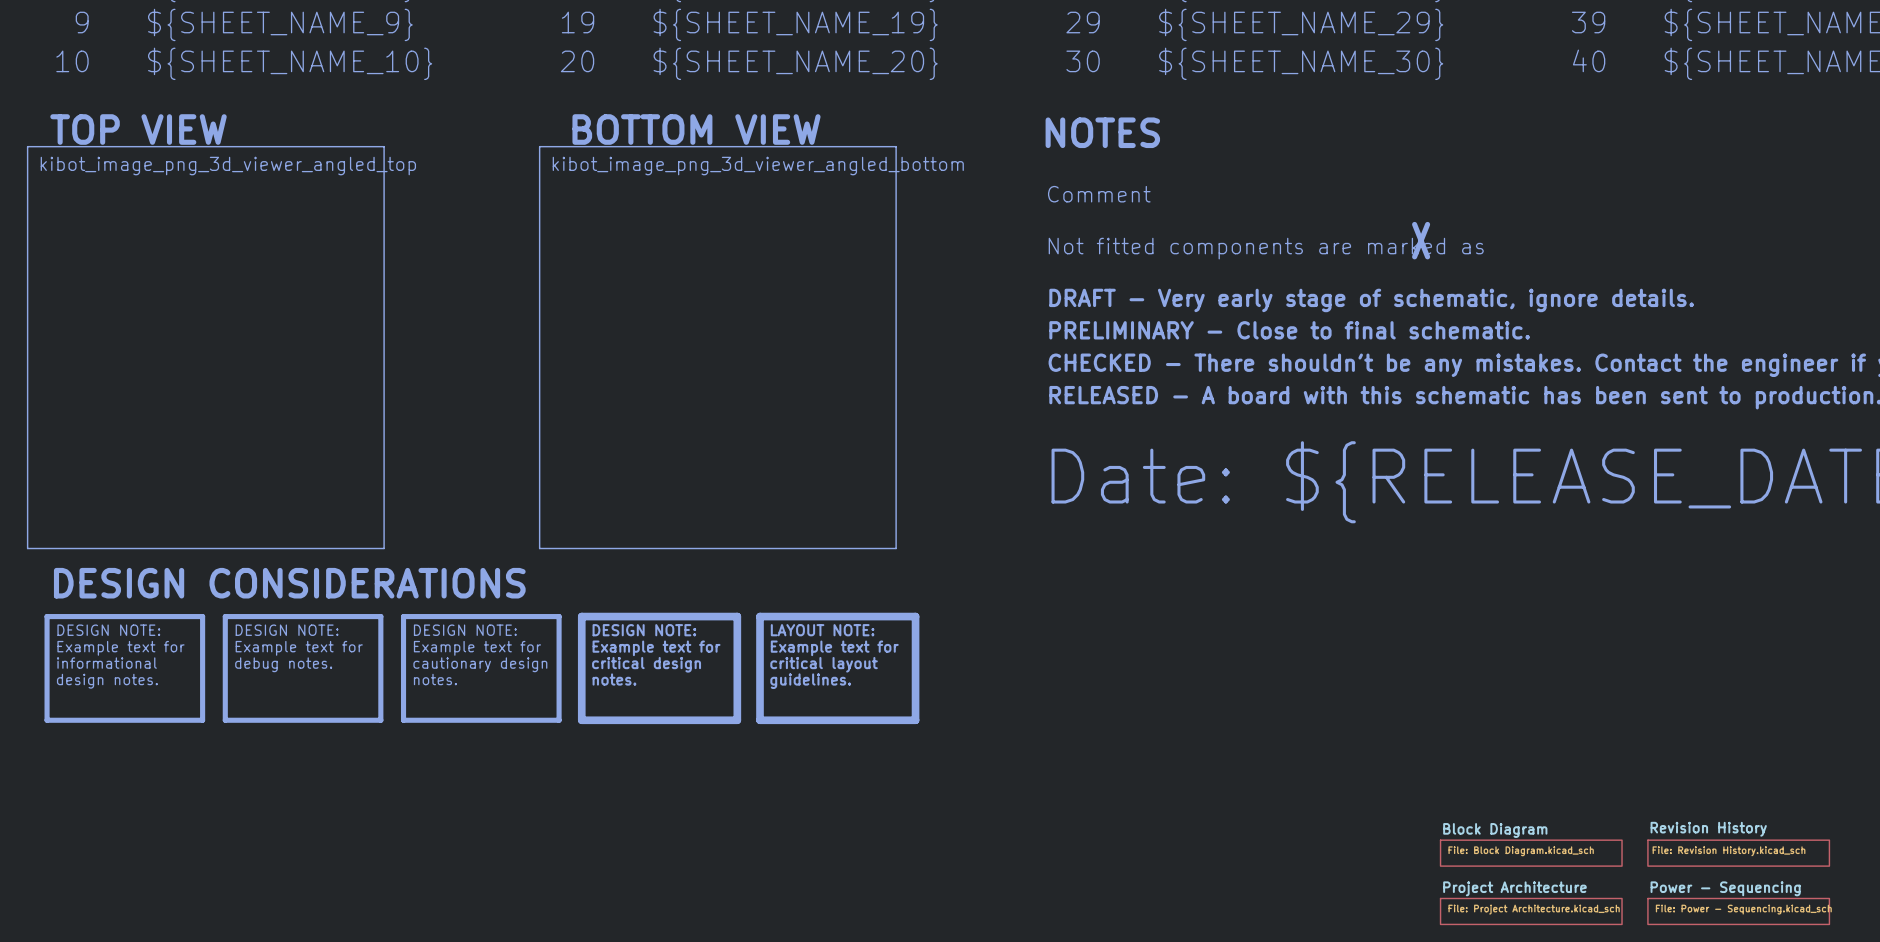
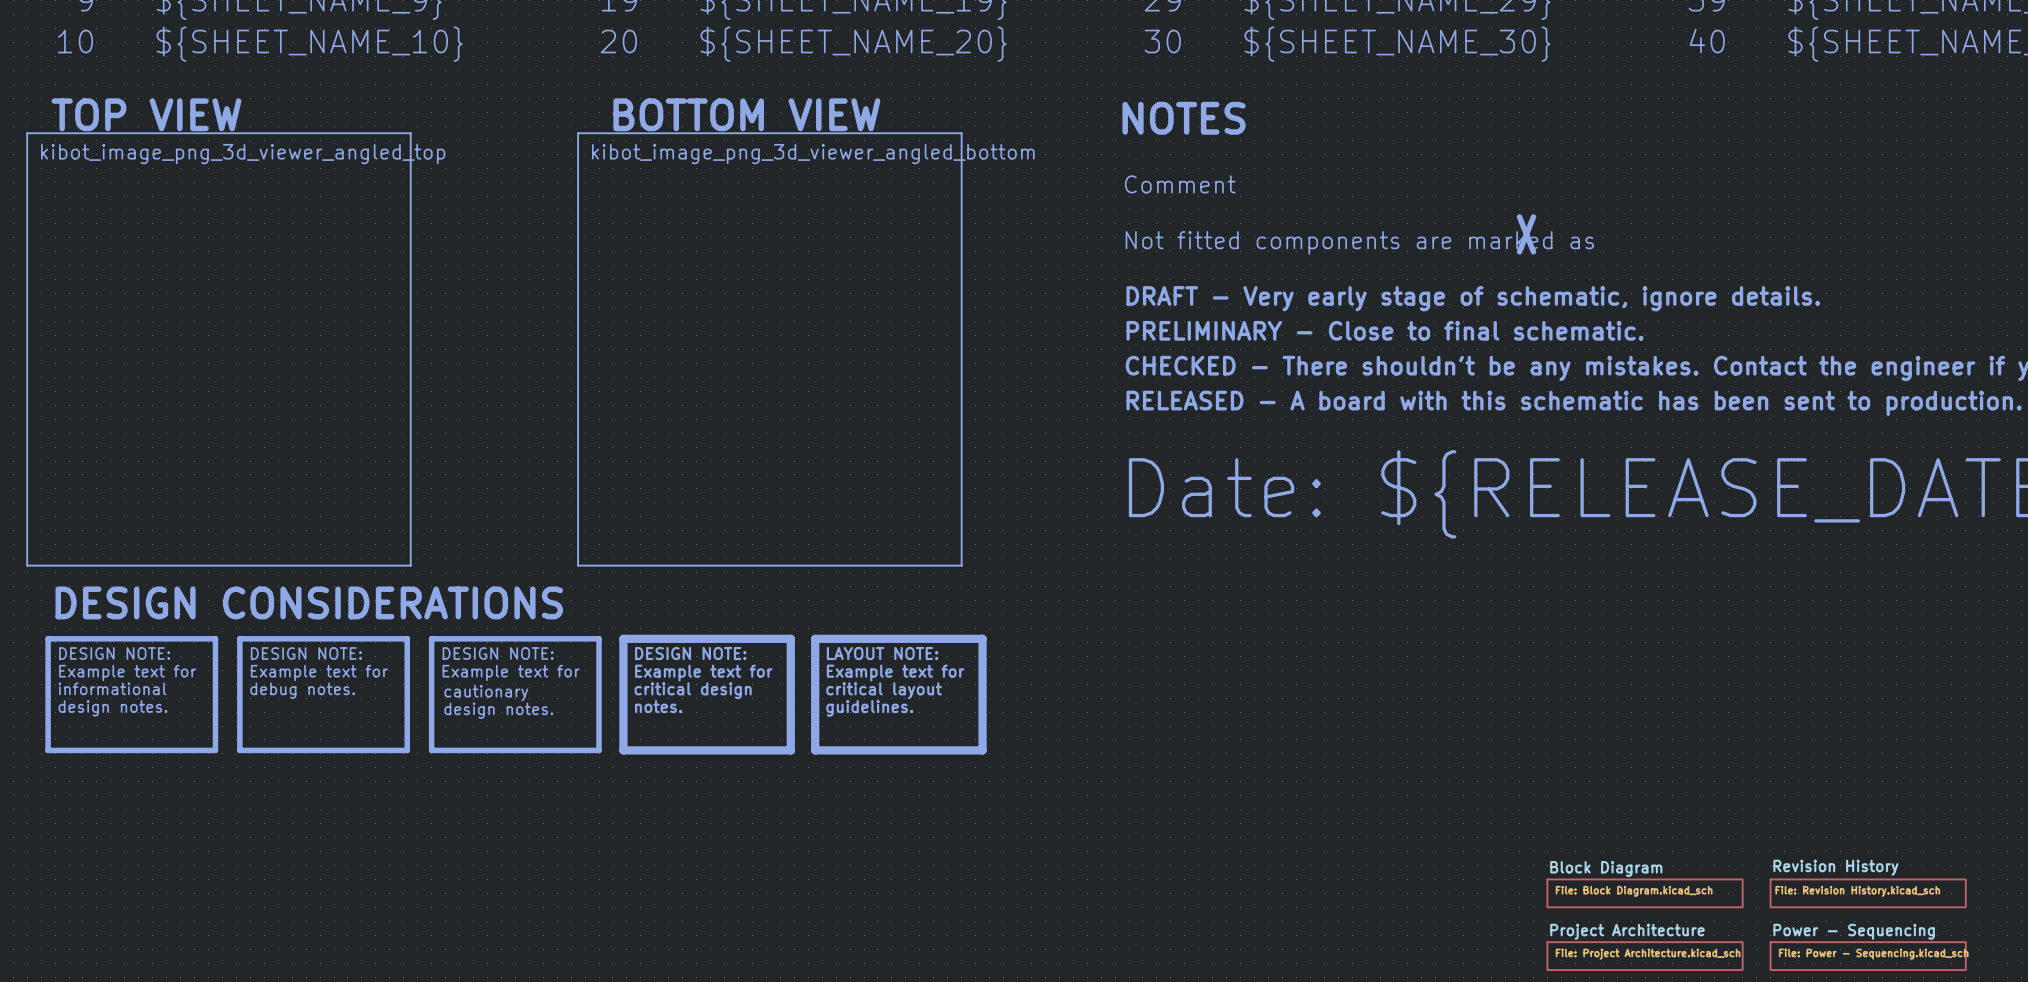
text: cautionary design (480, 664) -> cautionary (486, 693)
text: notes. (435, 679) -> design notes. (498, 710)

